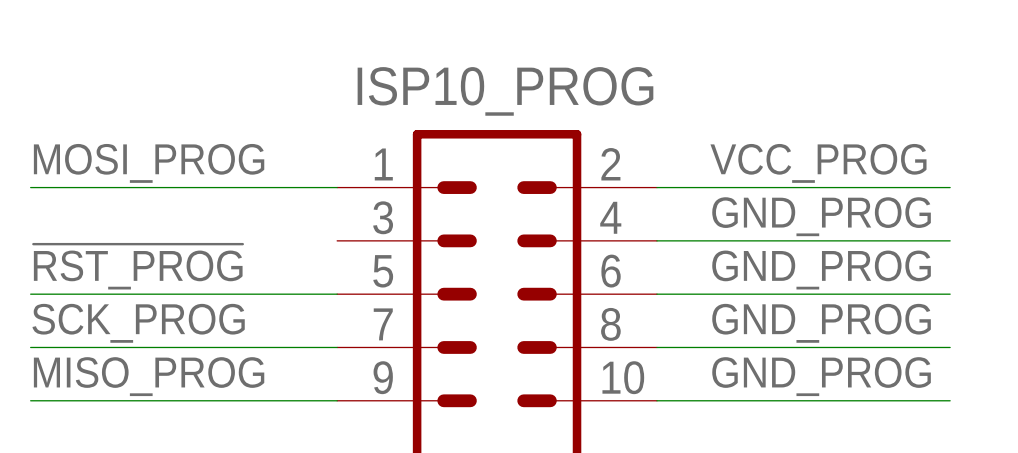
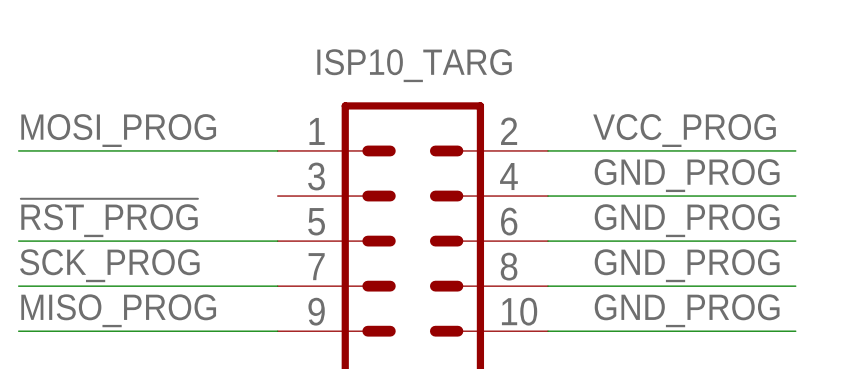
part value: ISP10_PROG (505, 91) -> ISP10_TARG (414, 65)

